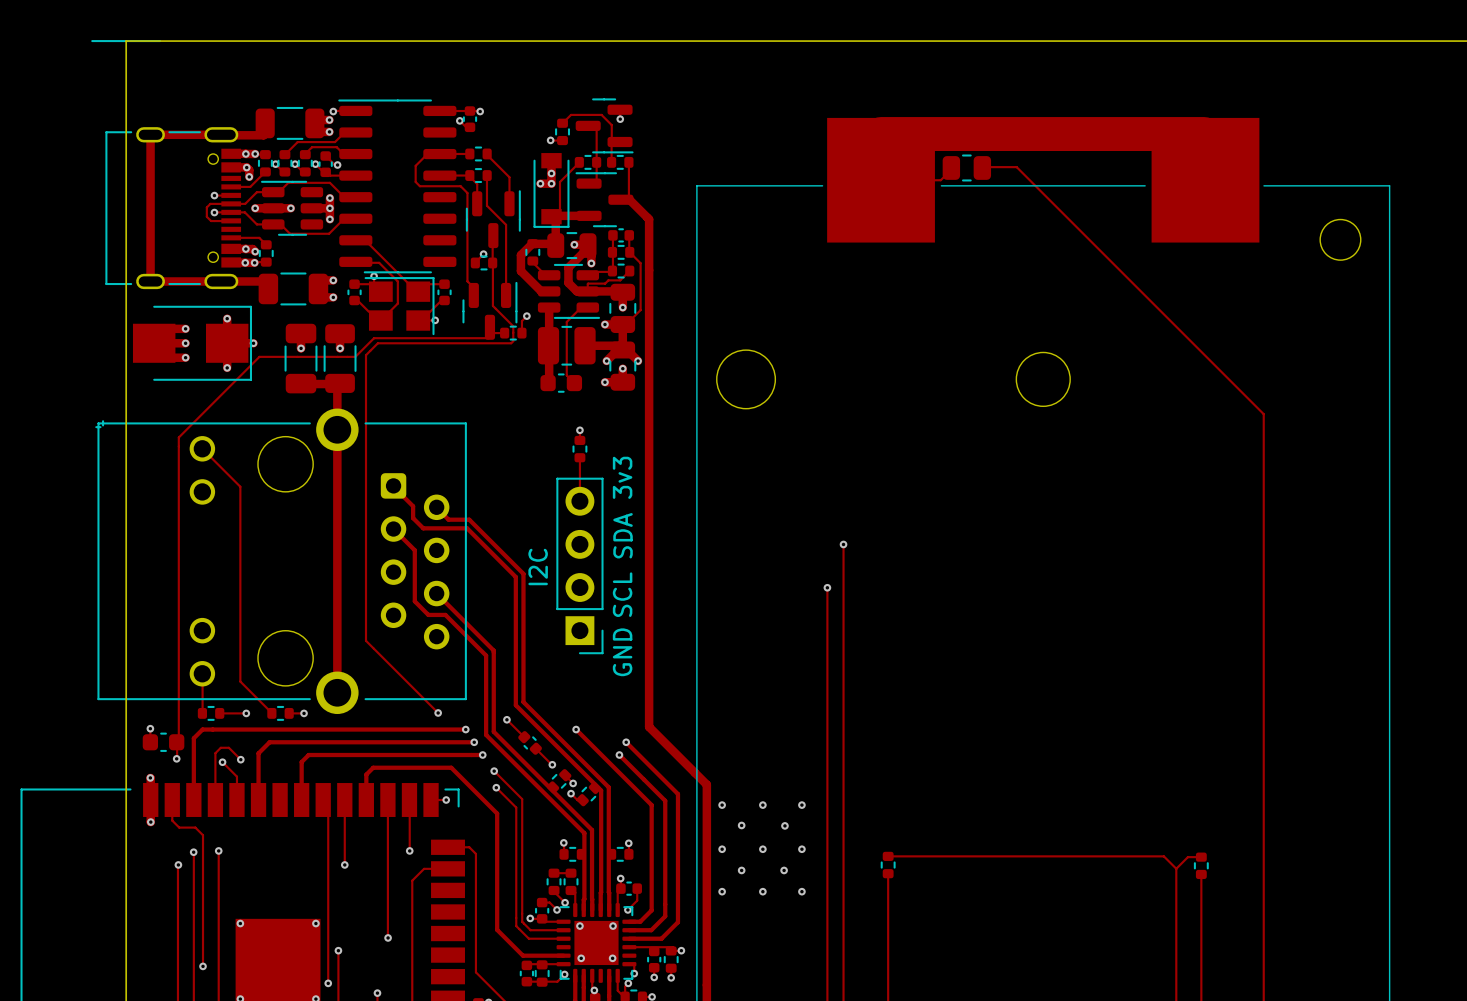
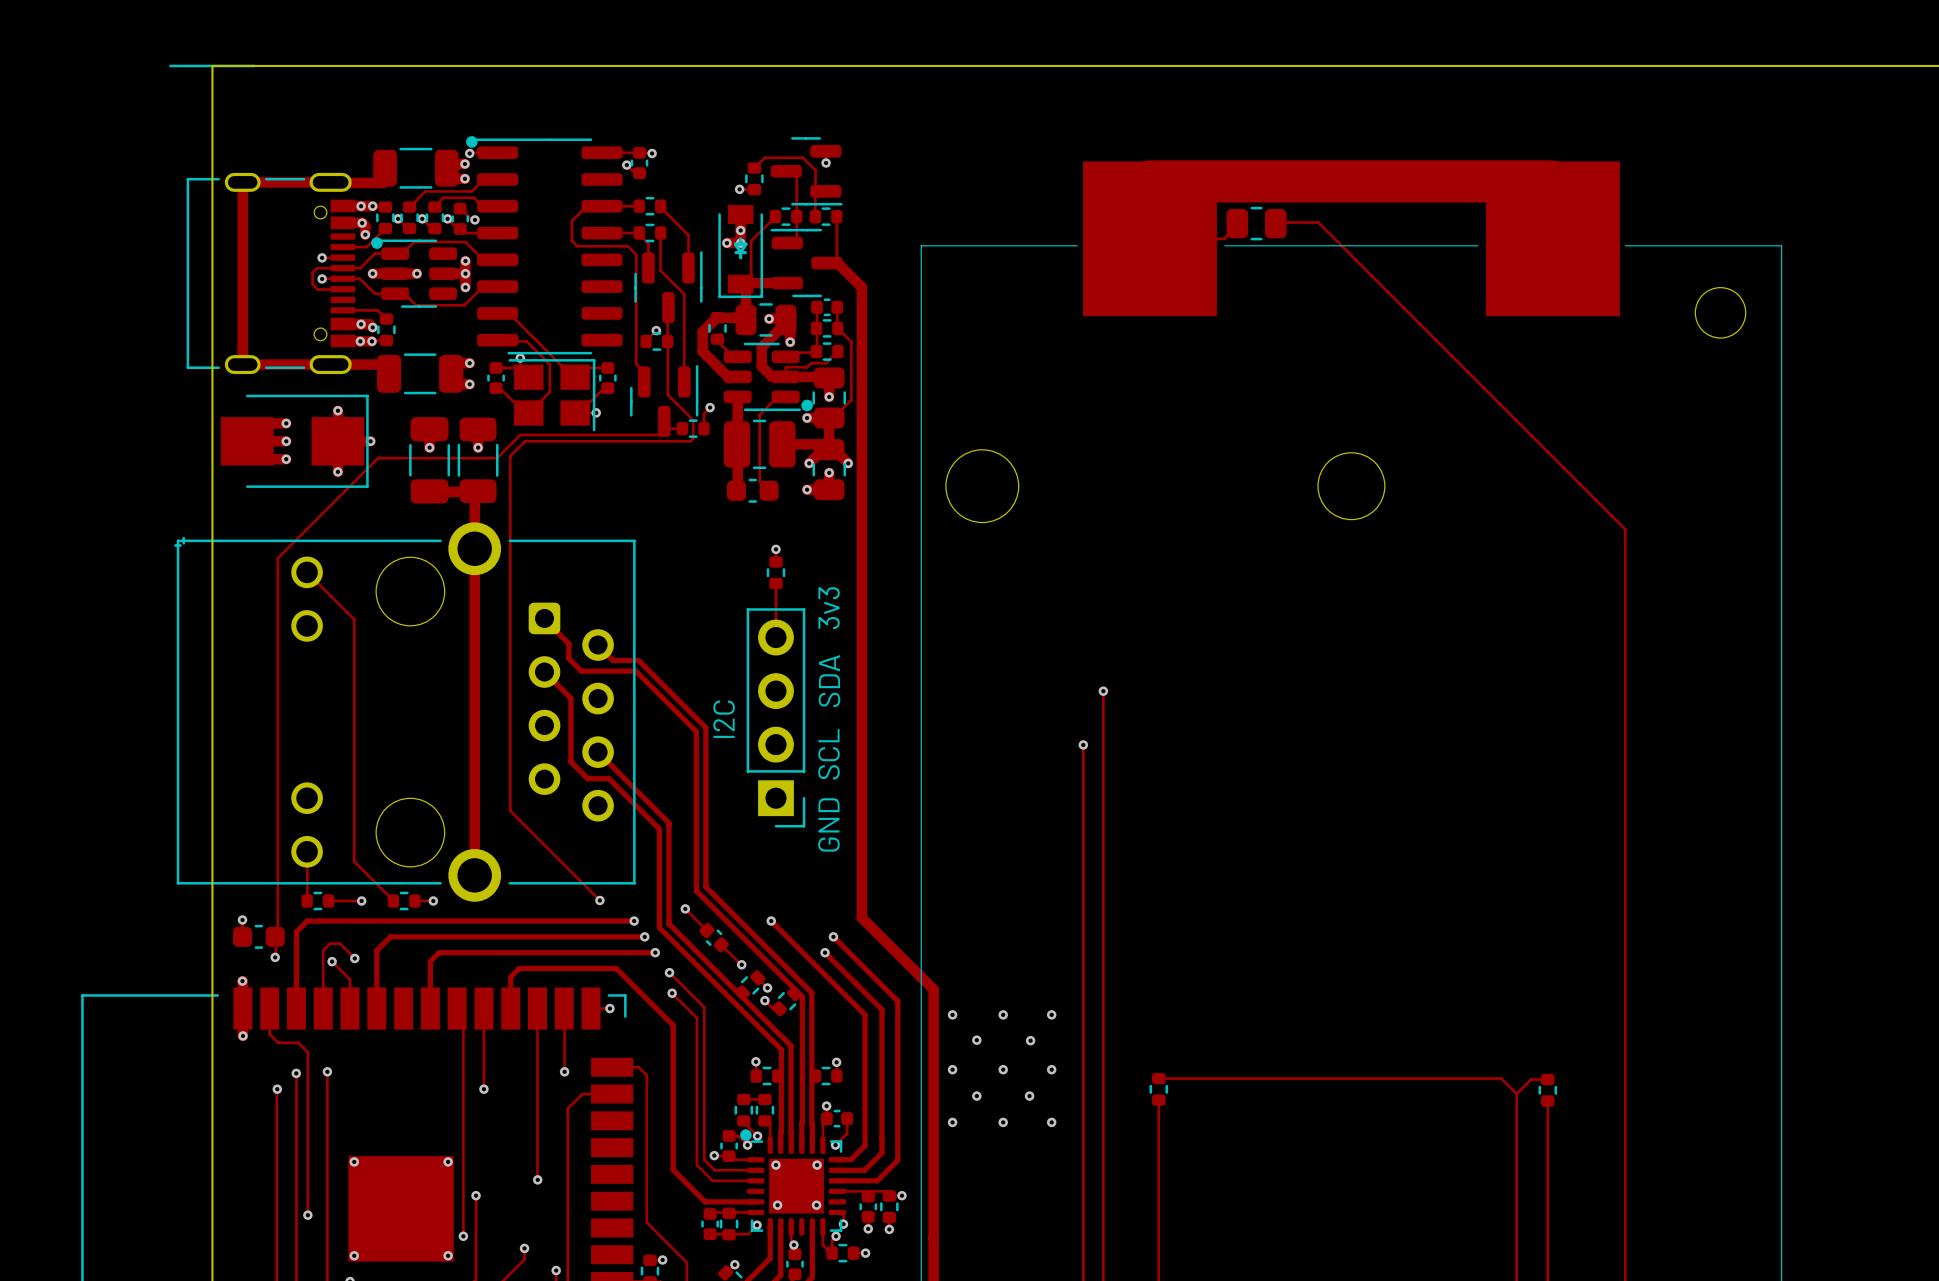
drawing: none -> [466, 136, 478, 148]
drawing: none -> [371, 237, 383, 249]
line: none -> (740, 238) (740, 244)
line: none -> (735, 252) (745, 252)
line: none -> (740, 252) (740, 257)
line: none -> (740, 252) (745, 244) (735, 244) (740, 252)
drawing: none -> [801, 399, 813, 412]
drawing: none -> [740, 1129, 752, 1141]

